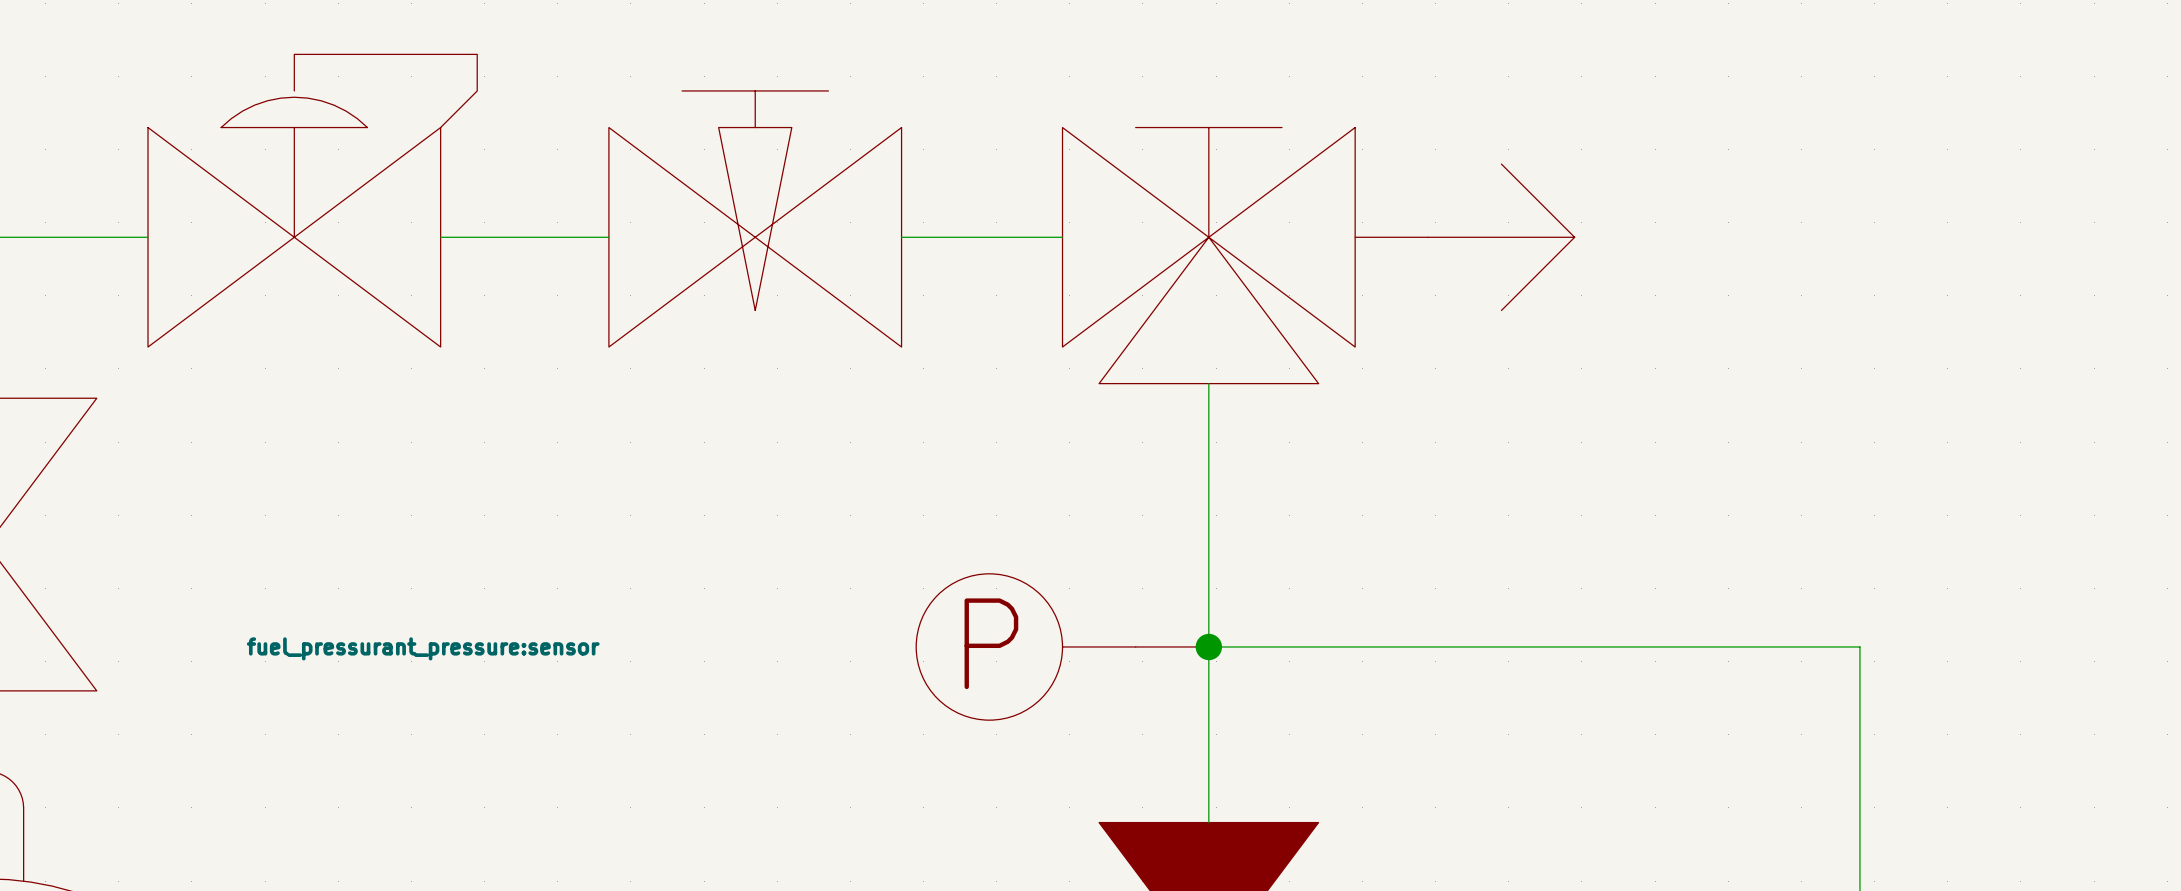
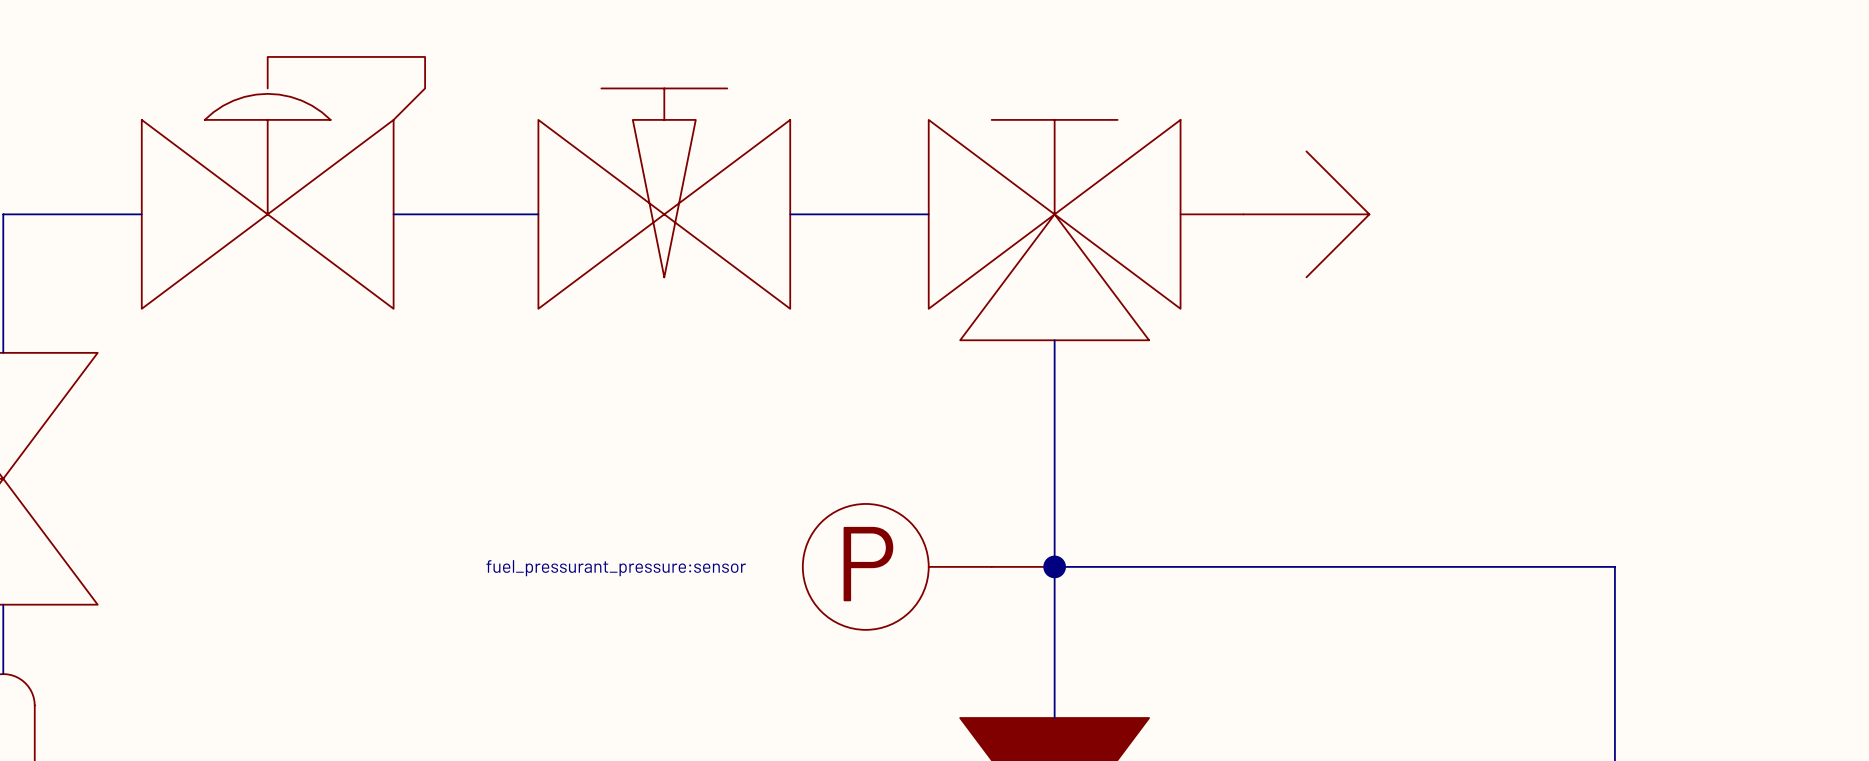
part value position: fuel_pressurant_pressure:sensor (423, 648) -> fuel_pressurant_pressure:sensor (616, 568)

